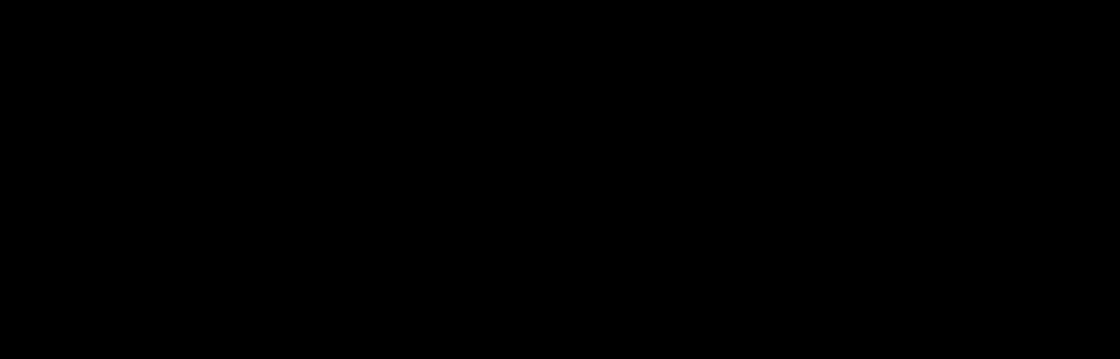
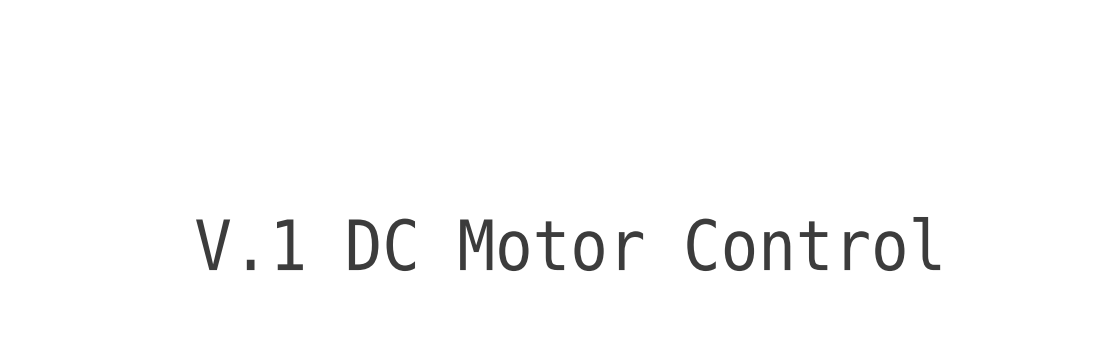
text: none -> V.1 DC Motor Control (568, 244)

